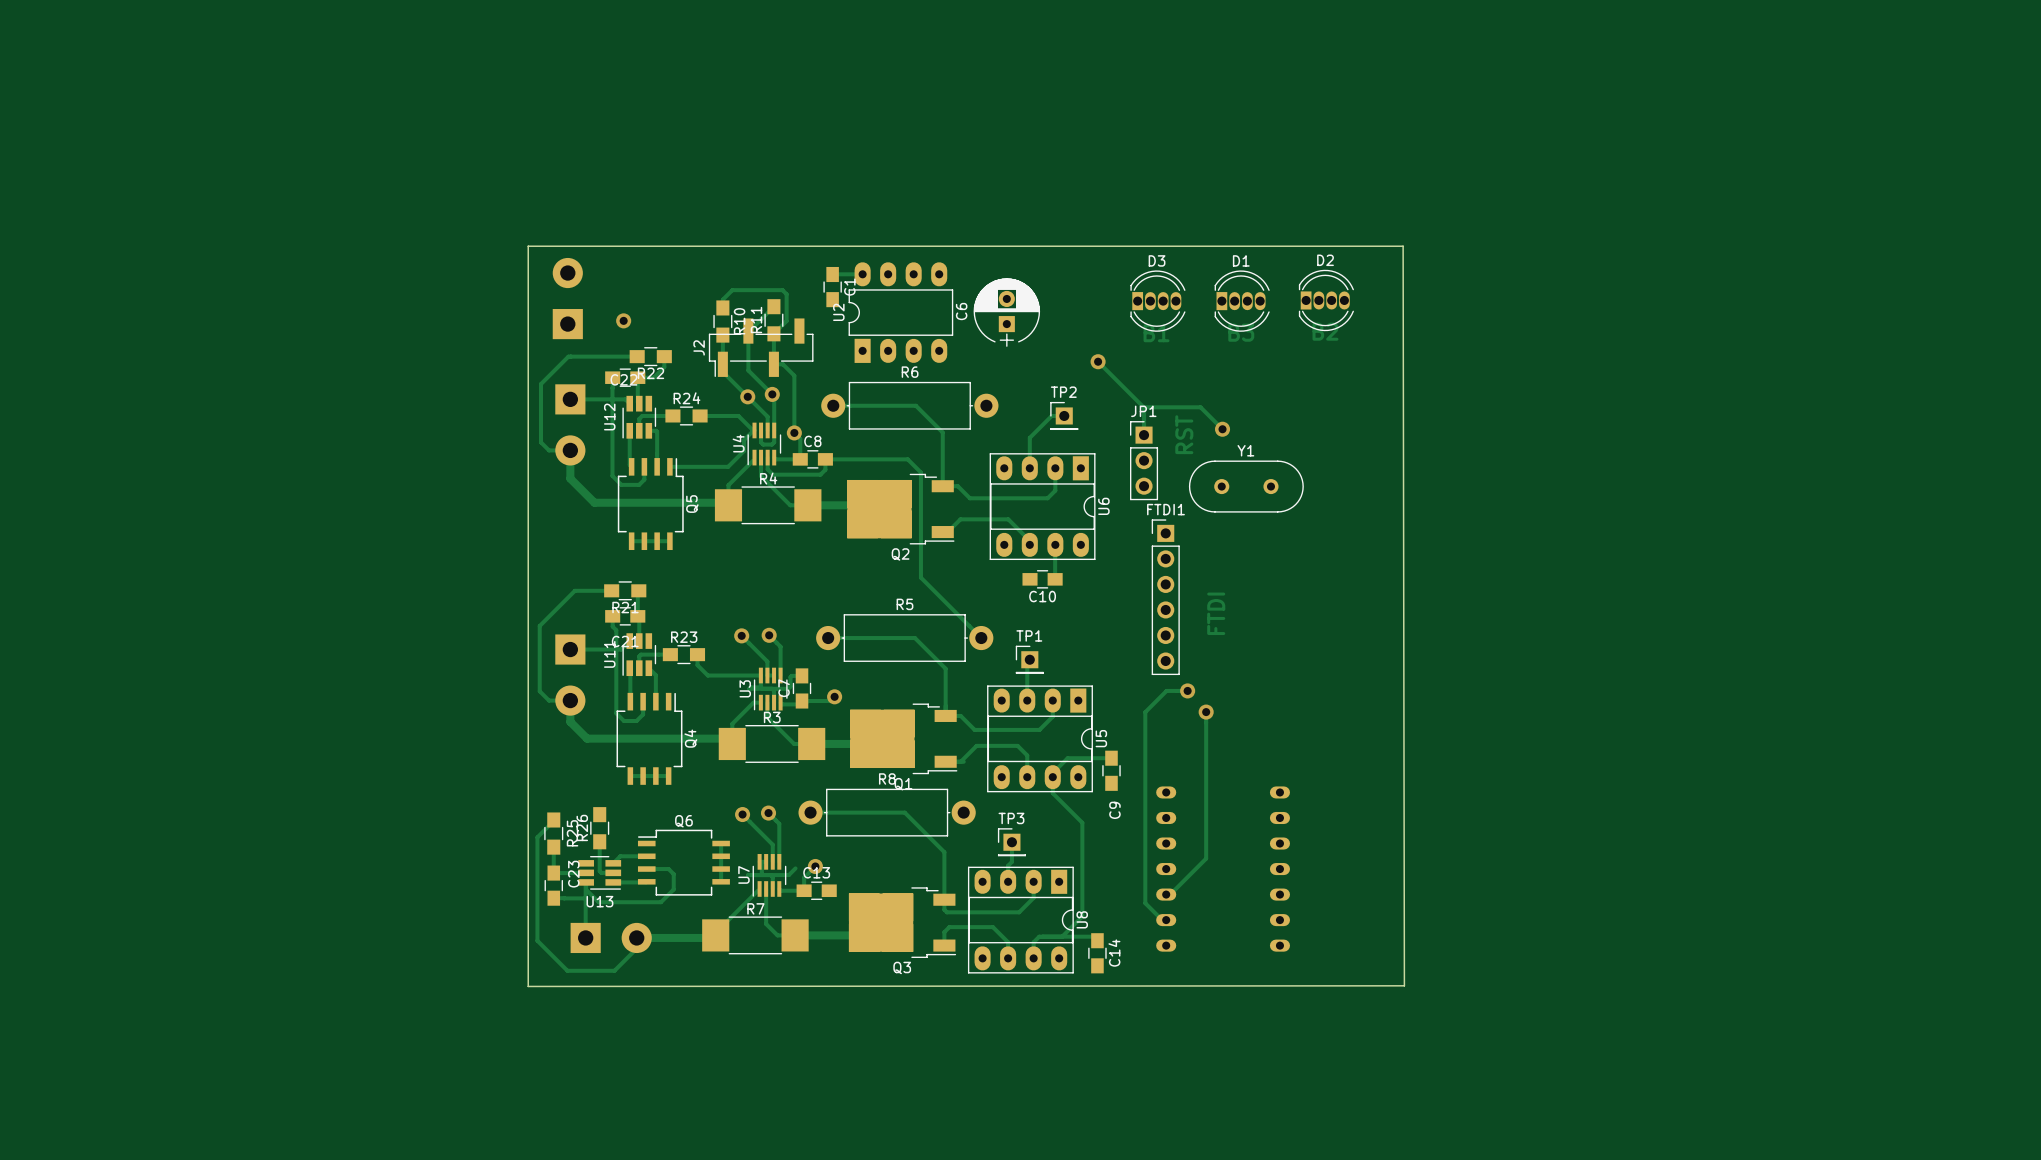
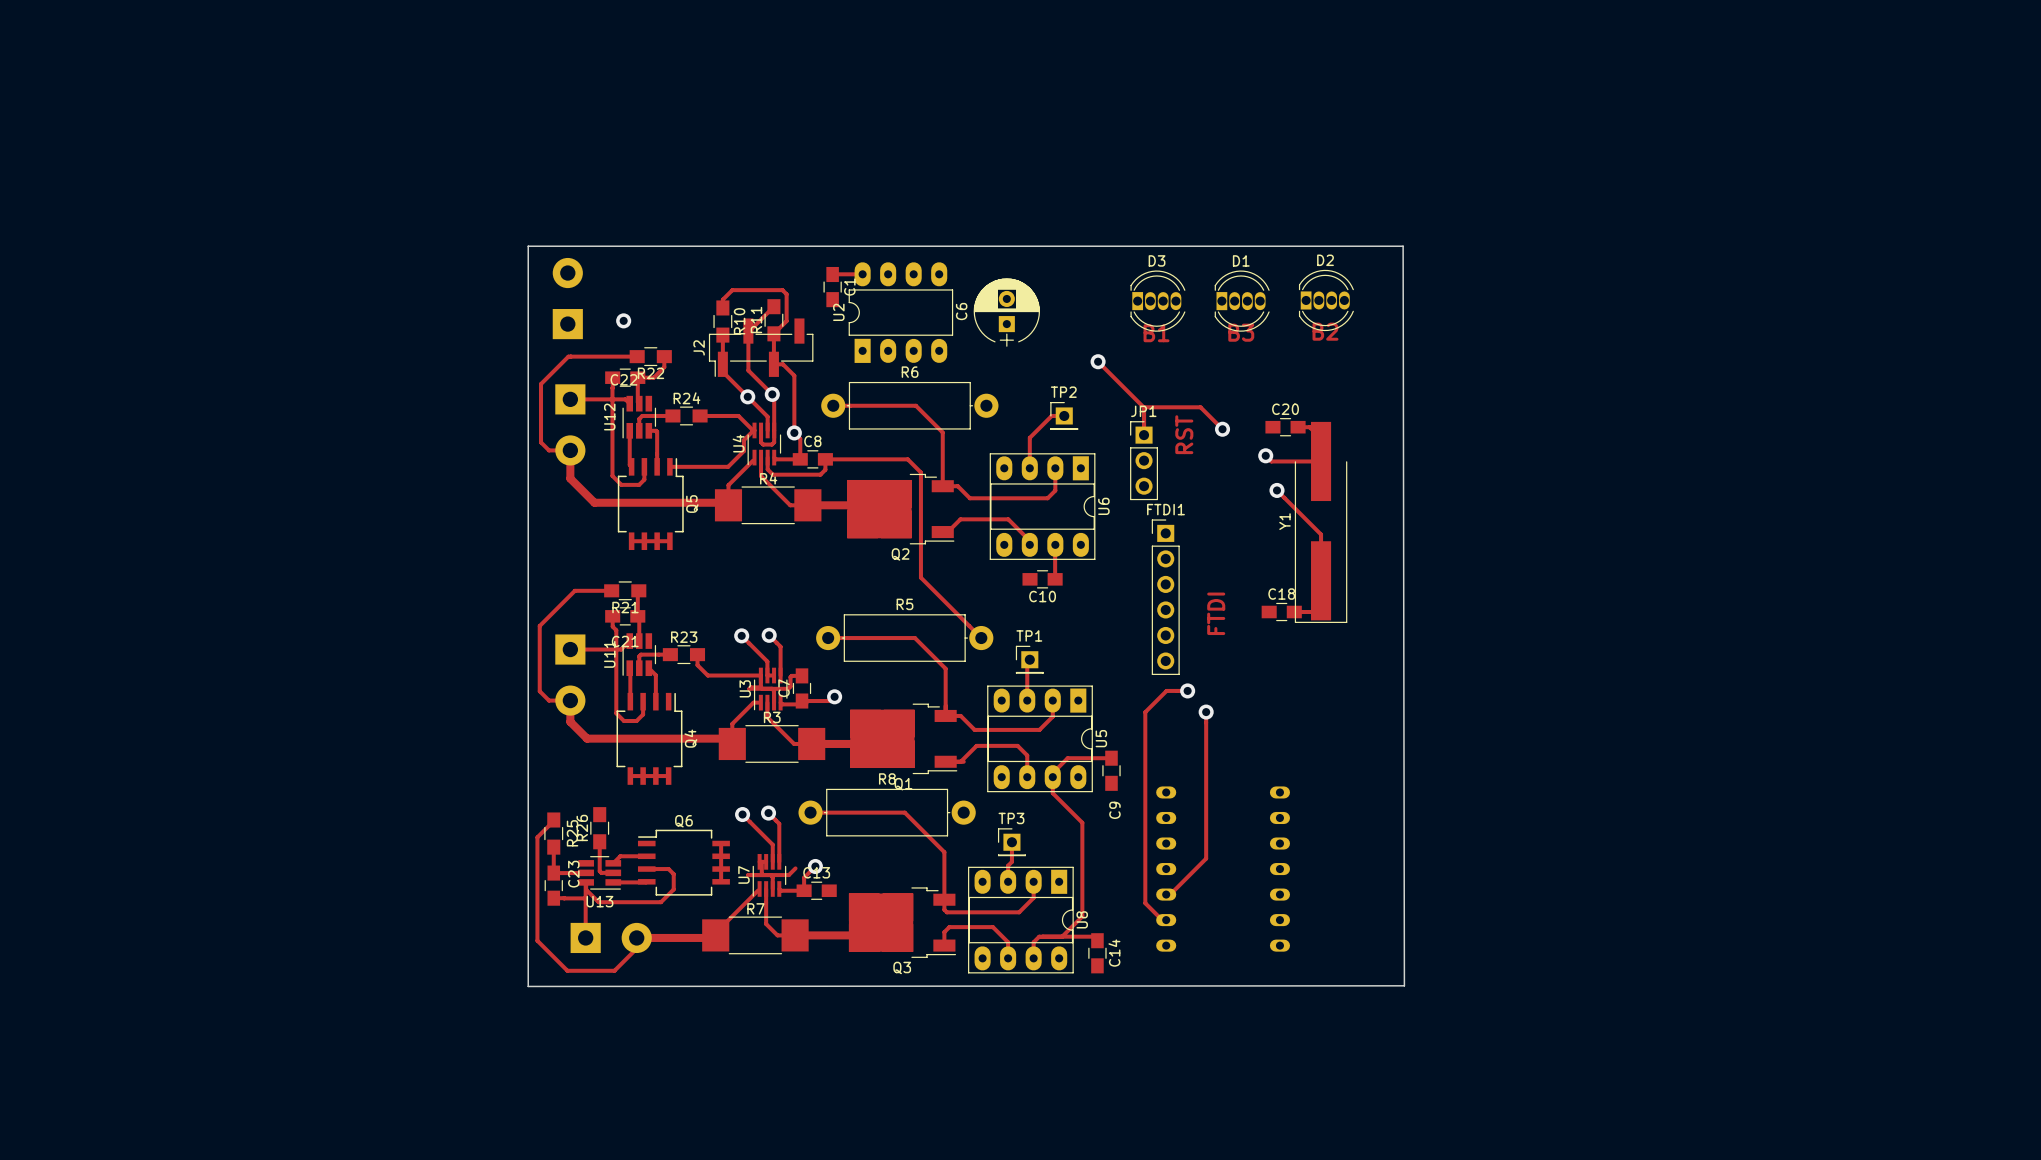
C20: none -> (1285, 427)
track: none -> (1298, 427) (1309, 427) (1321, 438) (1321, 461) (1271, 461) (1265, 455)
Y1 name position: Y1 (1245, 450) -> Y1 (1285, 521)
via: none -> (1265, 455)
Y1 footprint: [1188, 460, 1304, 513] -> [1294, 421, 1348, 623]
track: none -> (1277, 490) (1321, 534) (1321, 603) (1312, 612) (1294, 612)
via: none -> (1277, 490)
C18: none -> (1281, 612)

